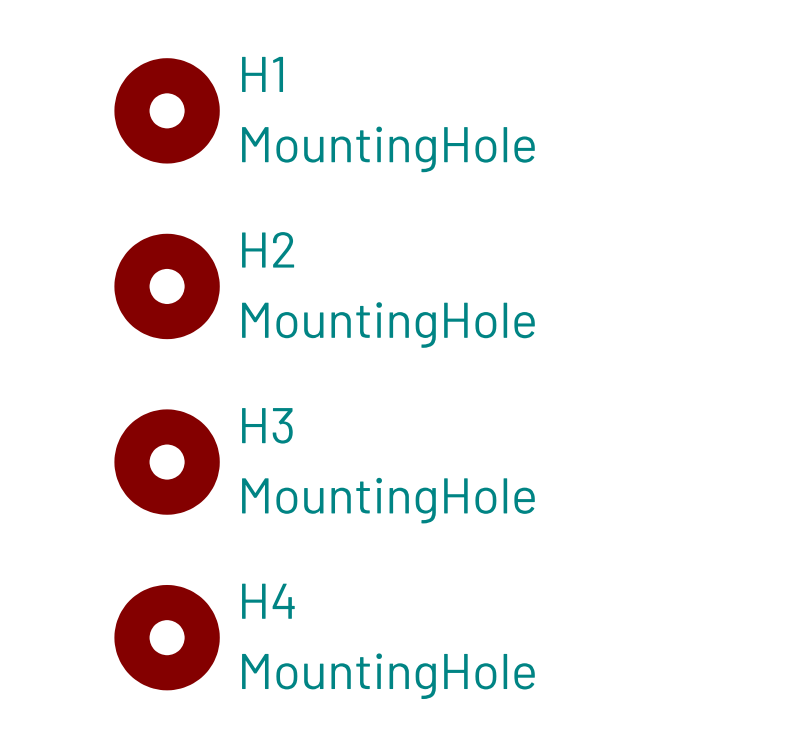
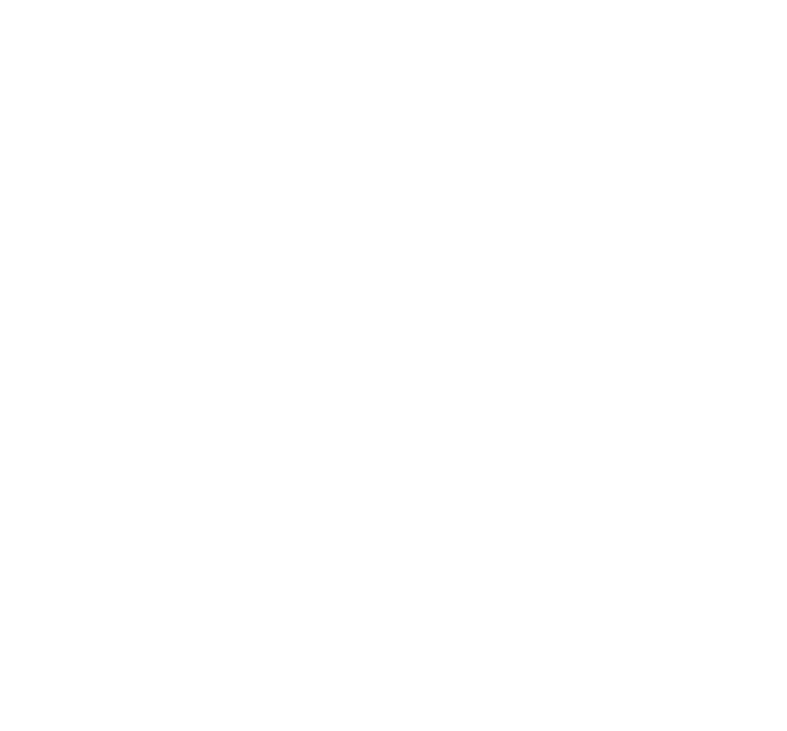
H1: MountingHole (167, 110) -> none
H2: MountingHole (167, 286) -> none
H3: MountingHole (167, 462) -> none
H4: MountingHole (167, 637) -> none

